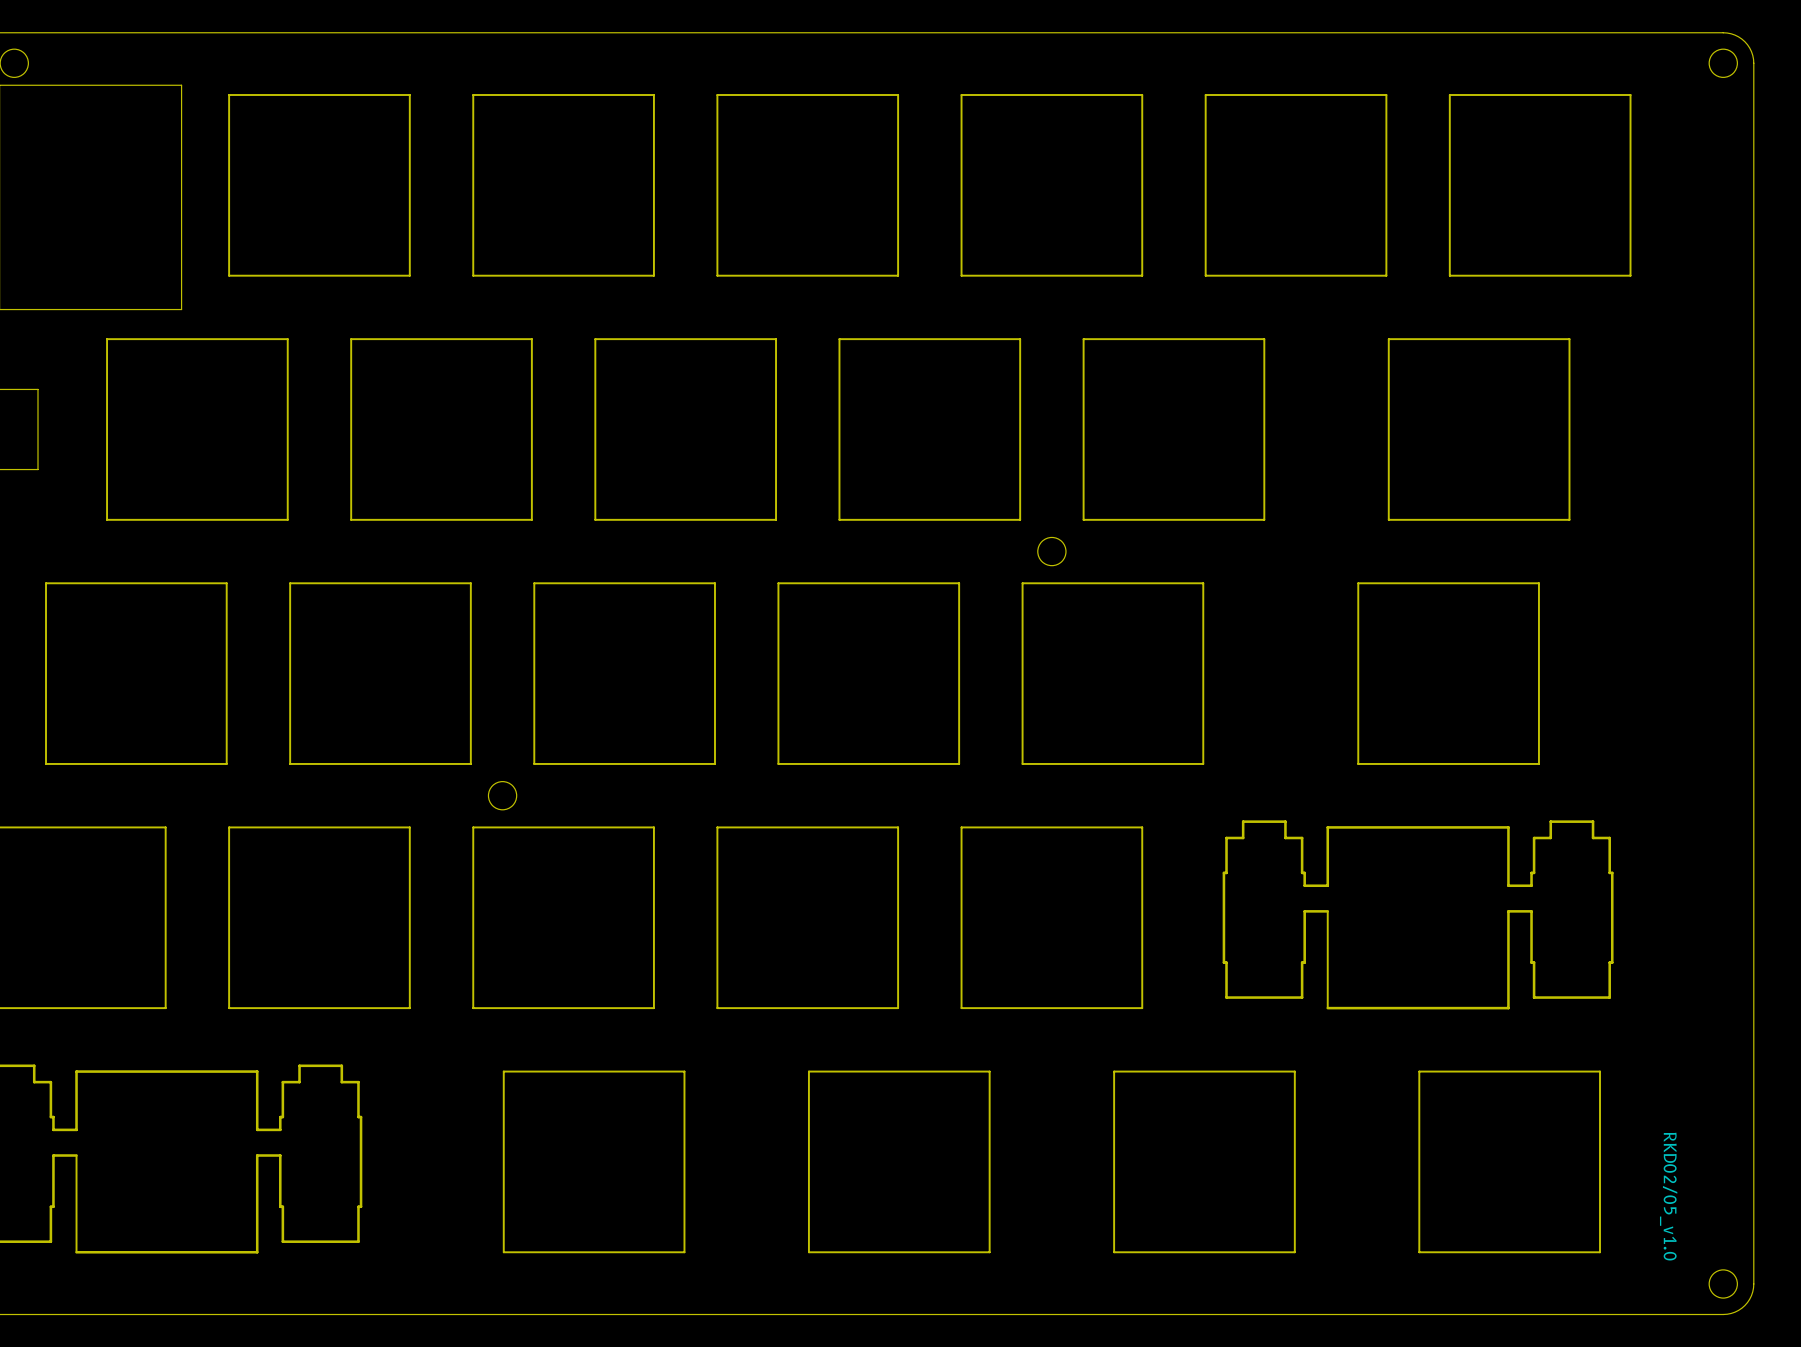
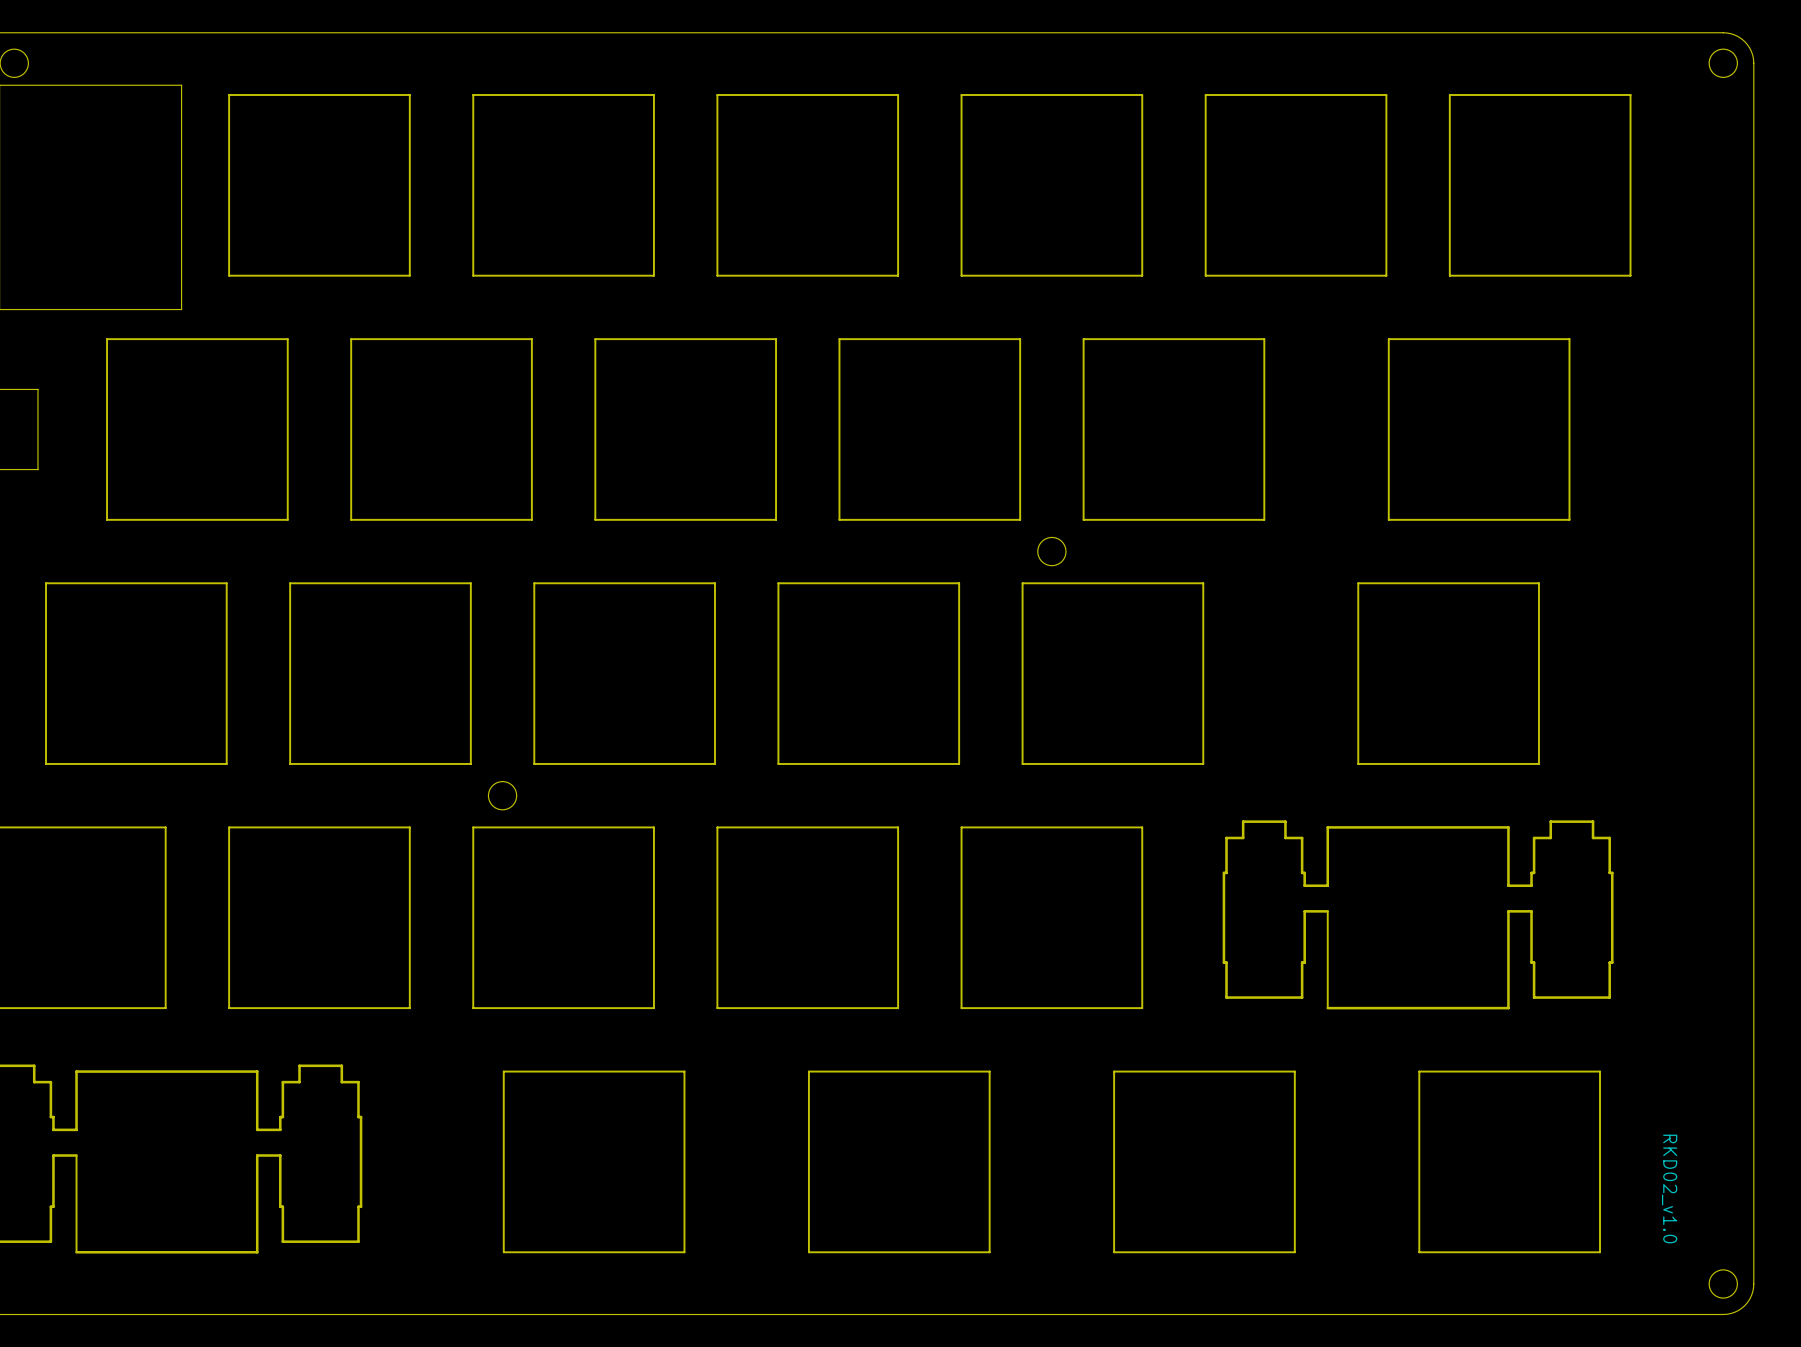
text: RKD02/05_v1.0 (1668, 1196) -> RKD02_v1.0 (1669, 1188)

